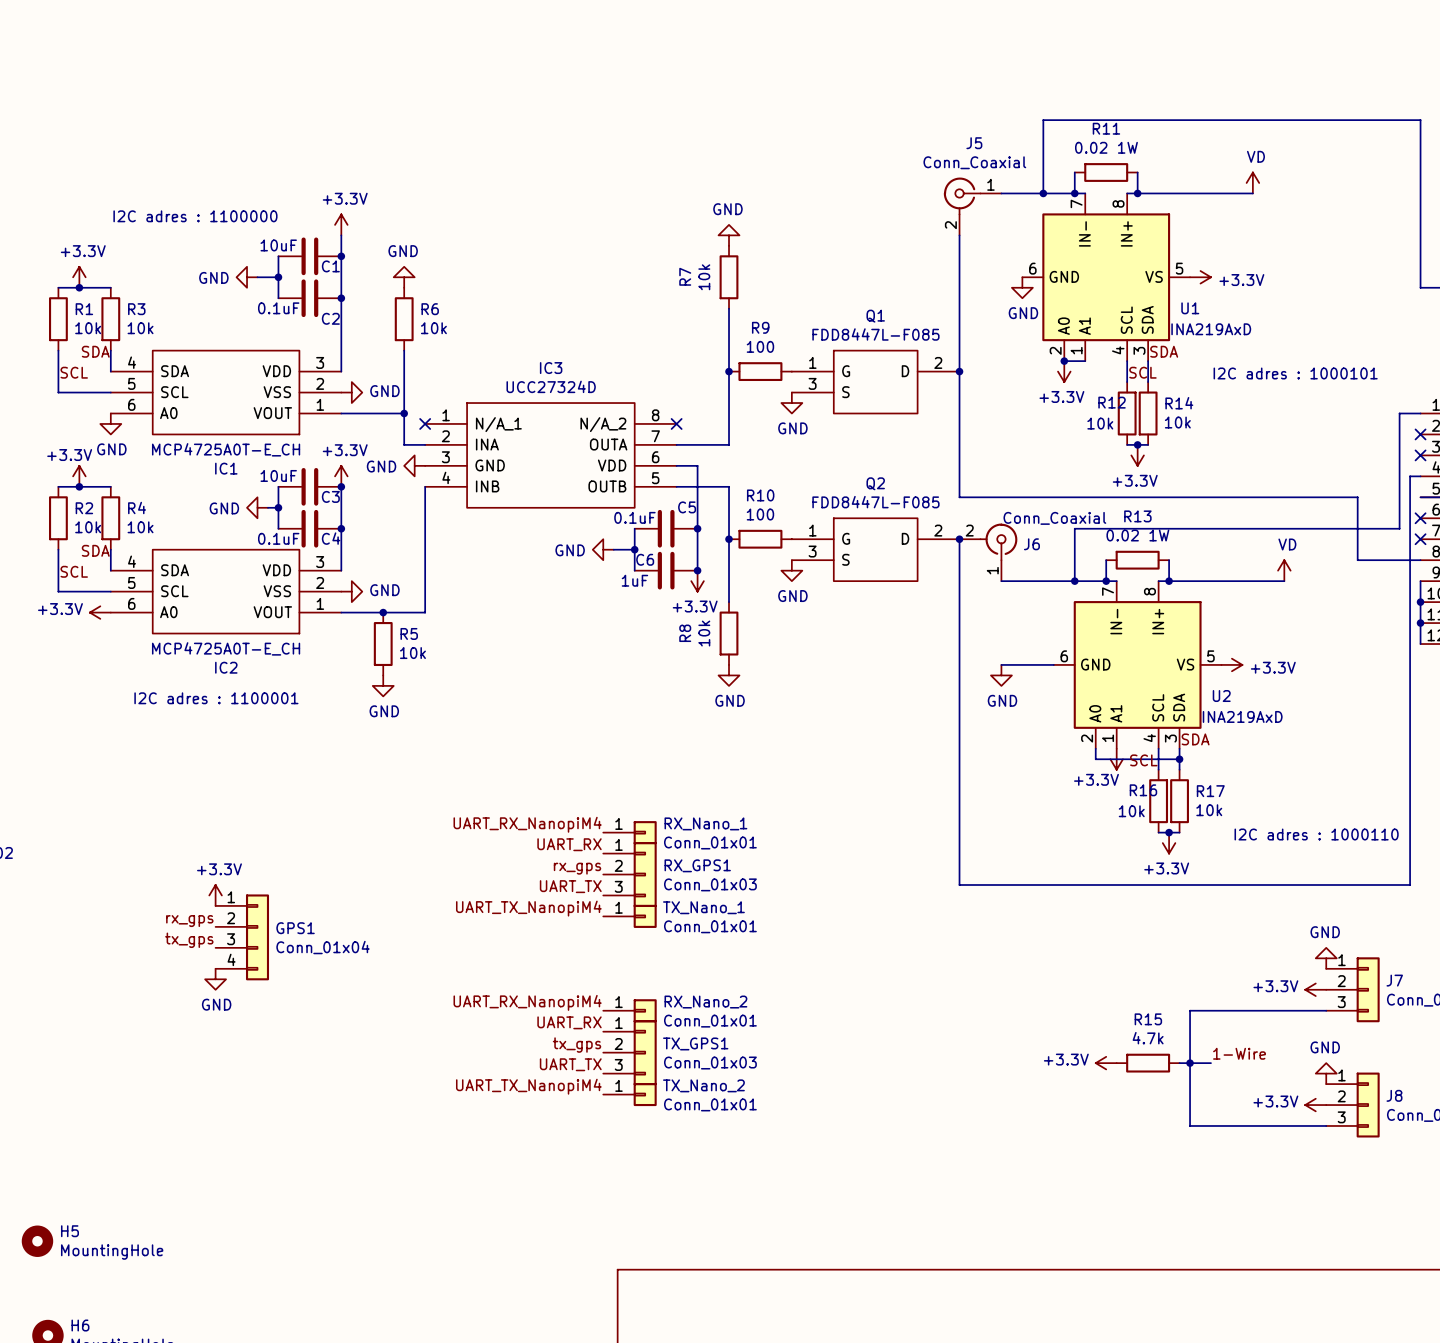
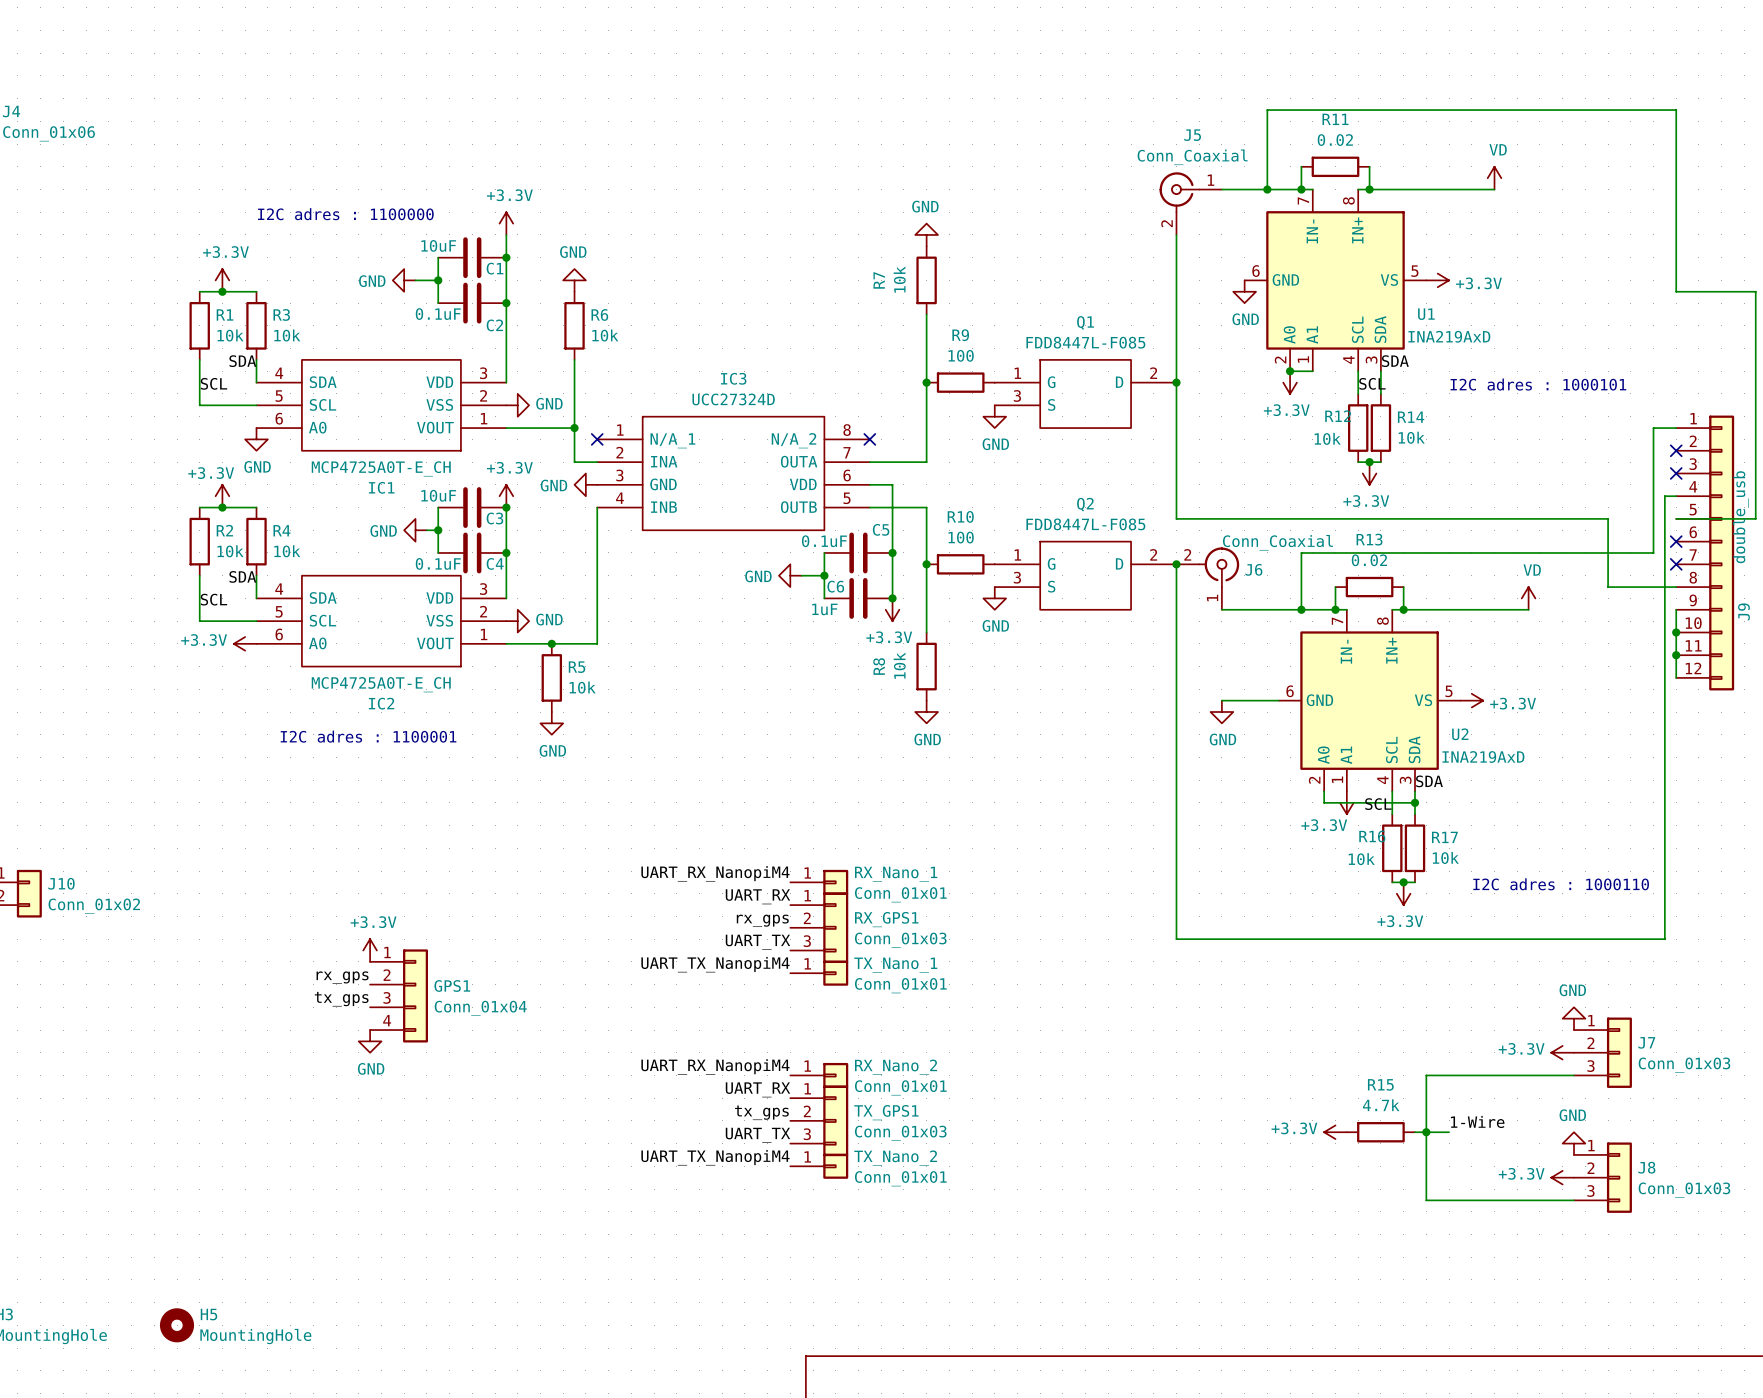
R11 value: 0.02 1W (1106, 147) -> 0.02 (1335, 140)
R13 value: 0.02 1W (1137, 535) -> 0.02 (1369, 560)

